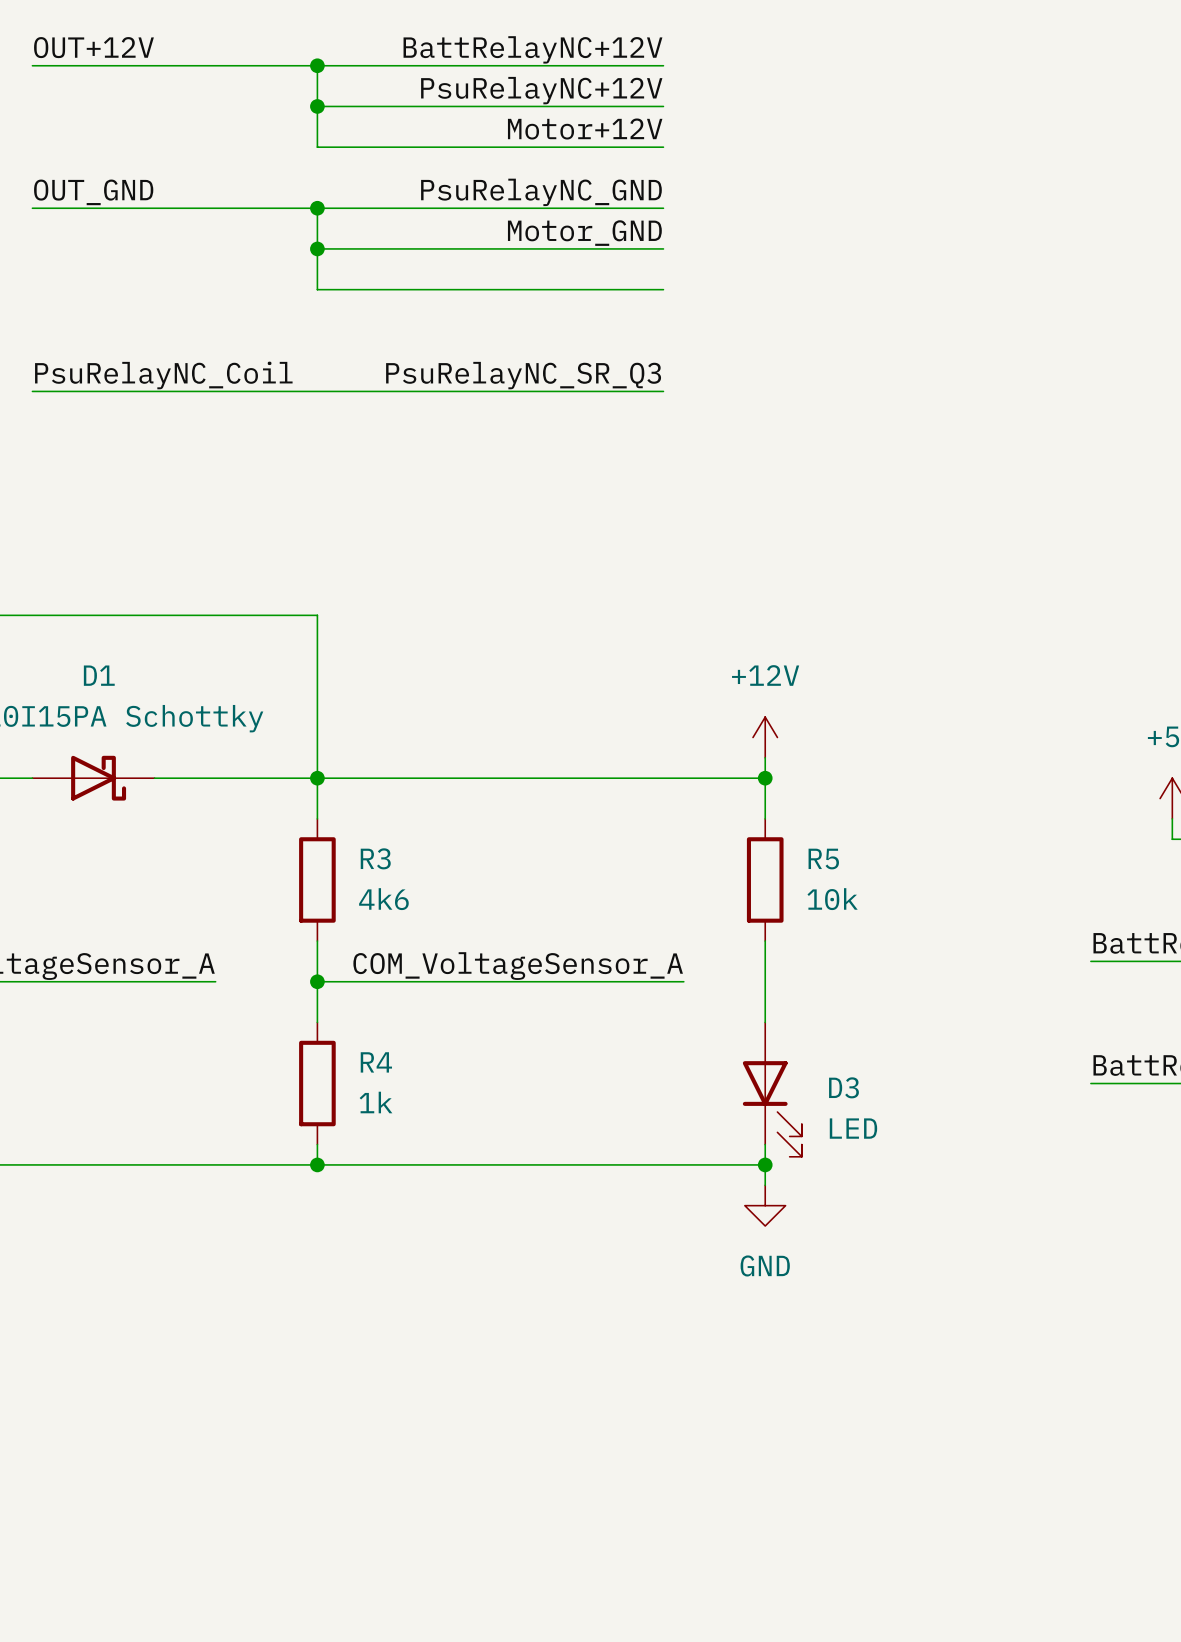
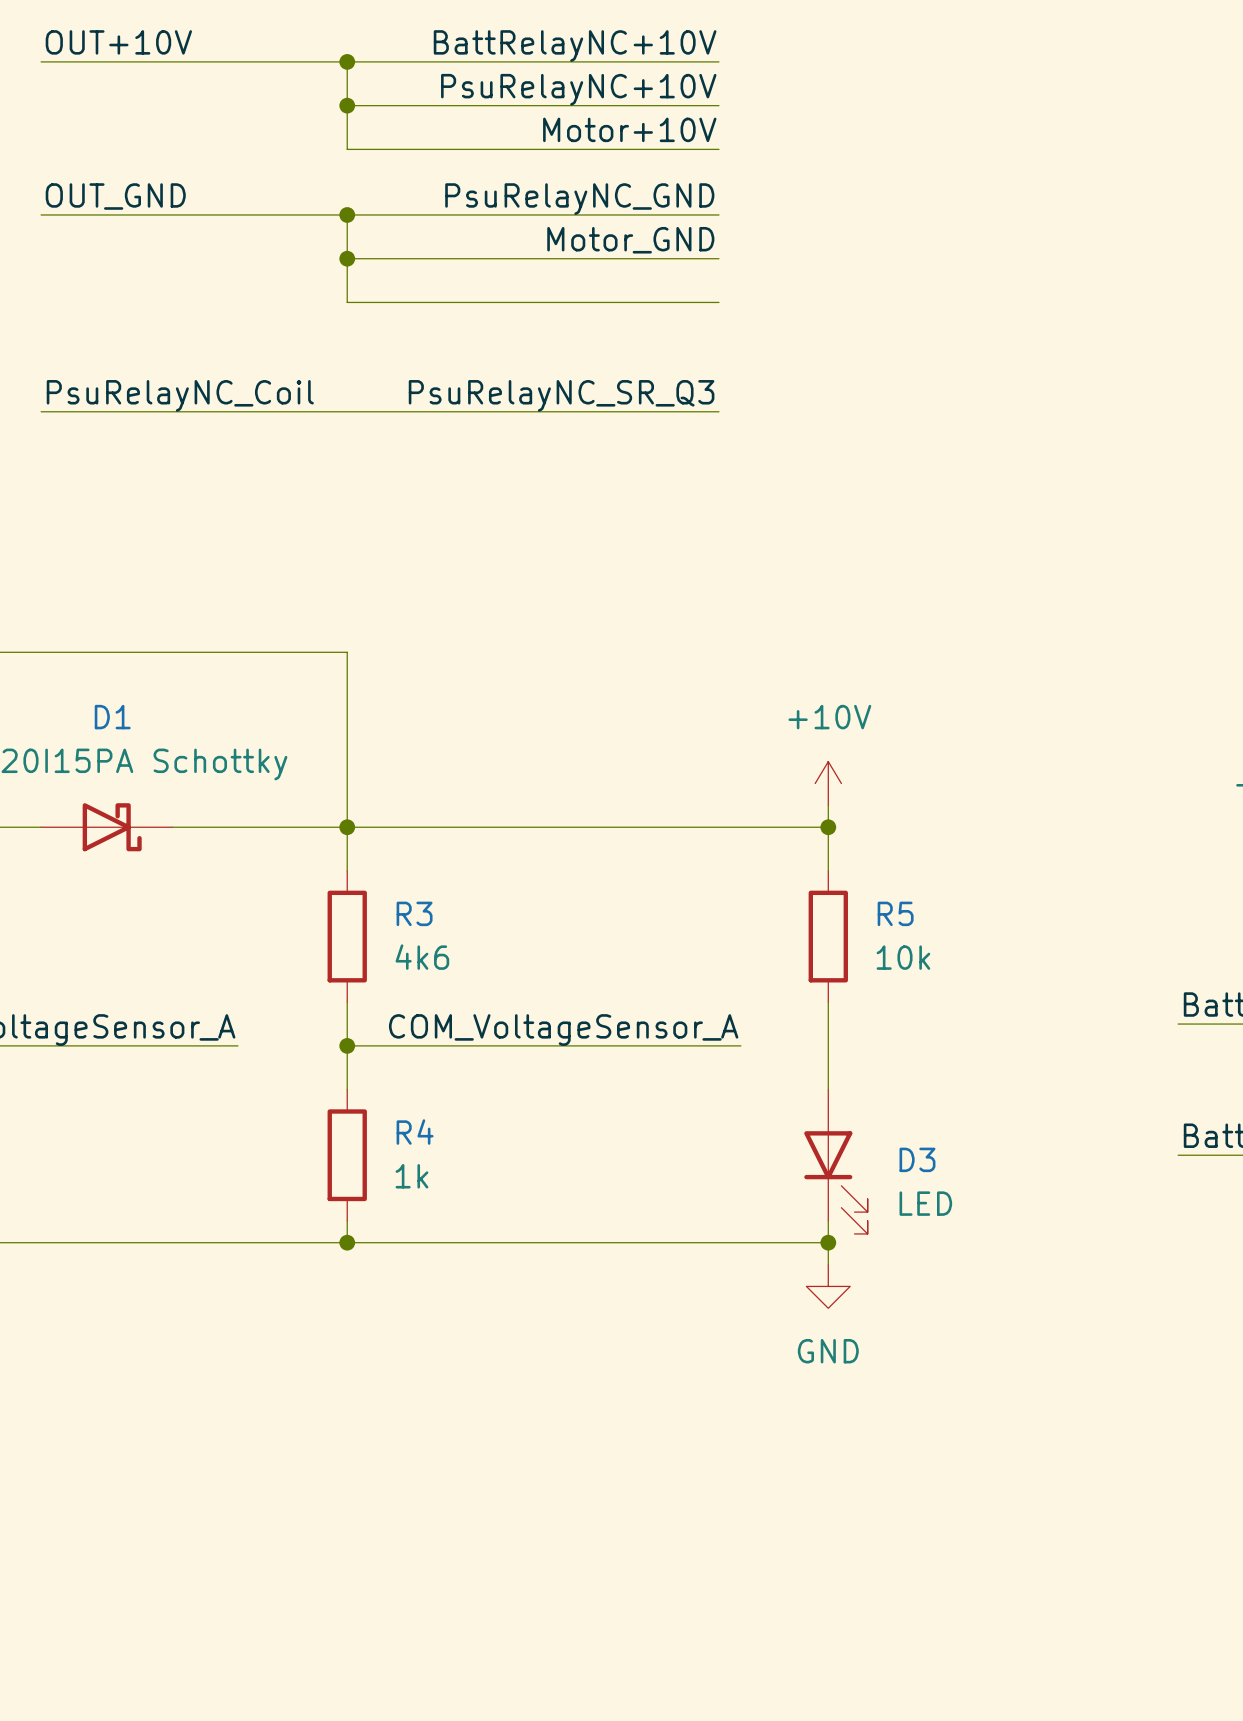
label: OUT+12V (93, 47) -> OUT+10V (118, 42)
label: BattRelayNC+12V (532, 49) -> BattRelayNC+10V (575, 46)
label: PsuRelayNC+12V (541, 90) -> PsuRelayNC+10V (578, 89)
label: Motor+12V (585, 129) -> Motor+10V (629, 129)
power symbol: +12V (765, 737) -> +10V (828, 783)

